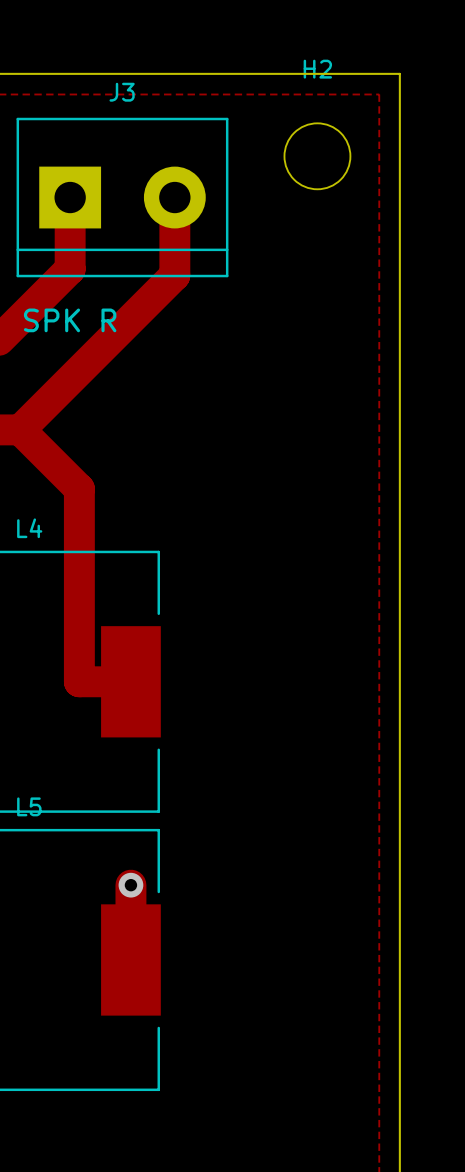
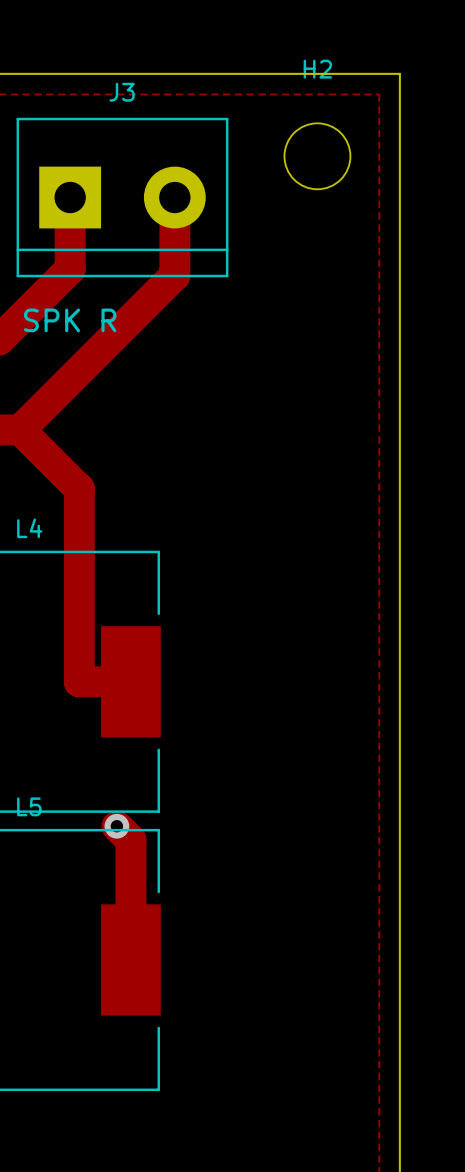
track: none -> (116, 826) (130, 840) (130, 885)
via position: (130, 885) -> (116, 826)

